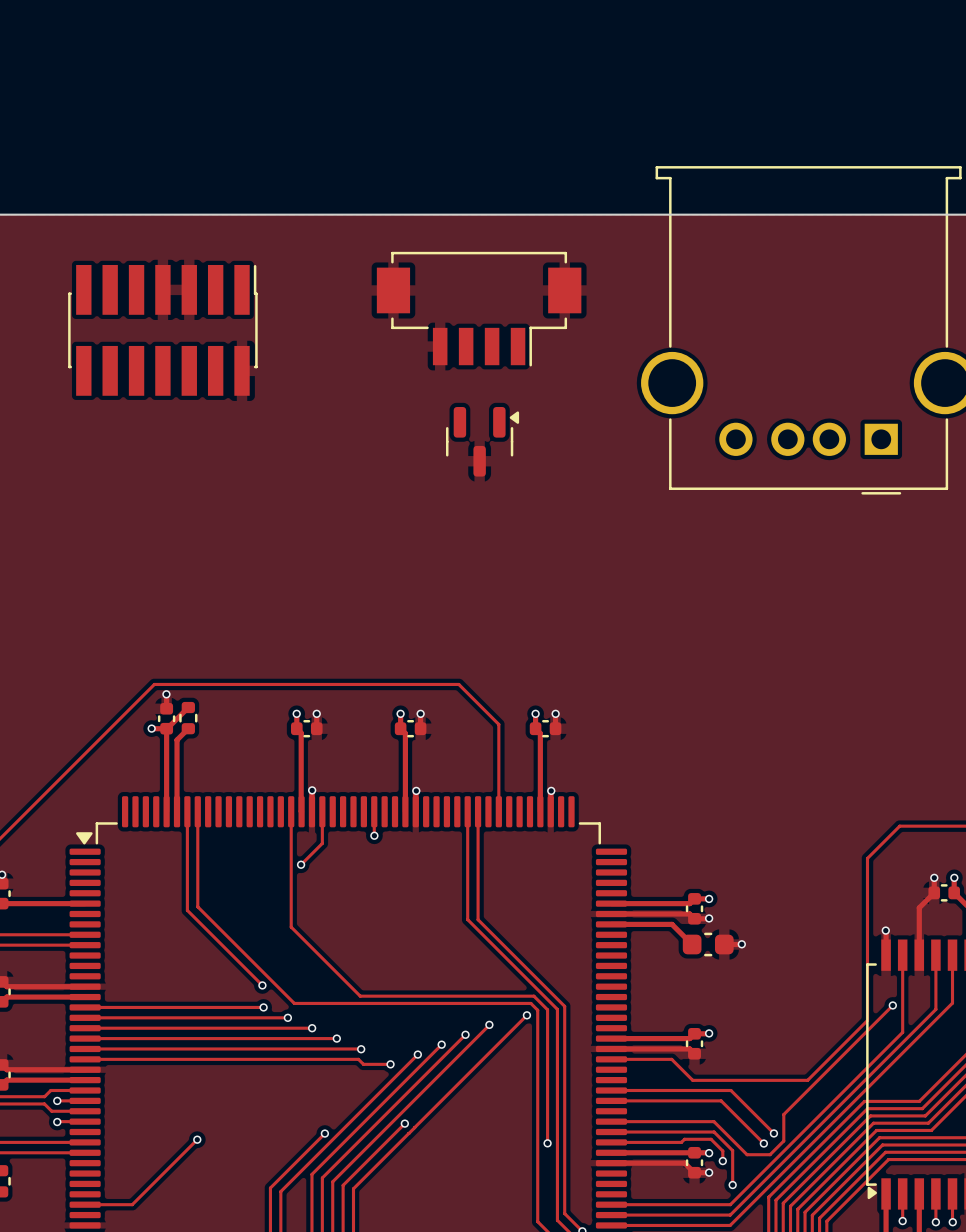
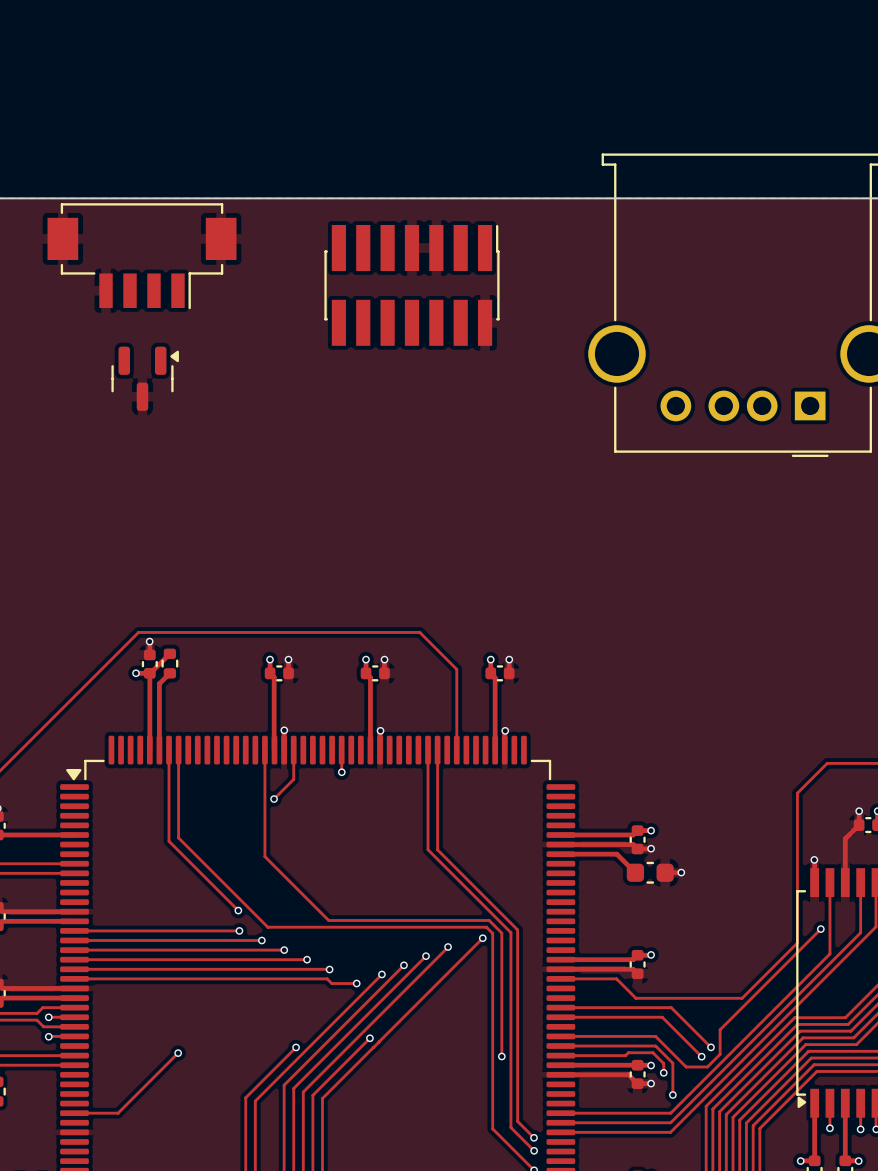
part position: (479, 309) -> (142, 256)
part position: (162, 330) -> (411, 285)
part position: (482, 441) -> (145, 378)

